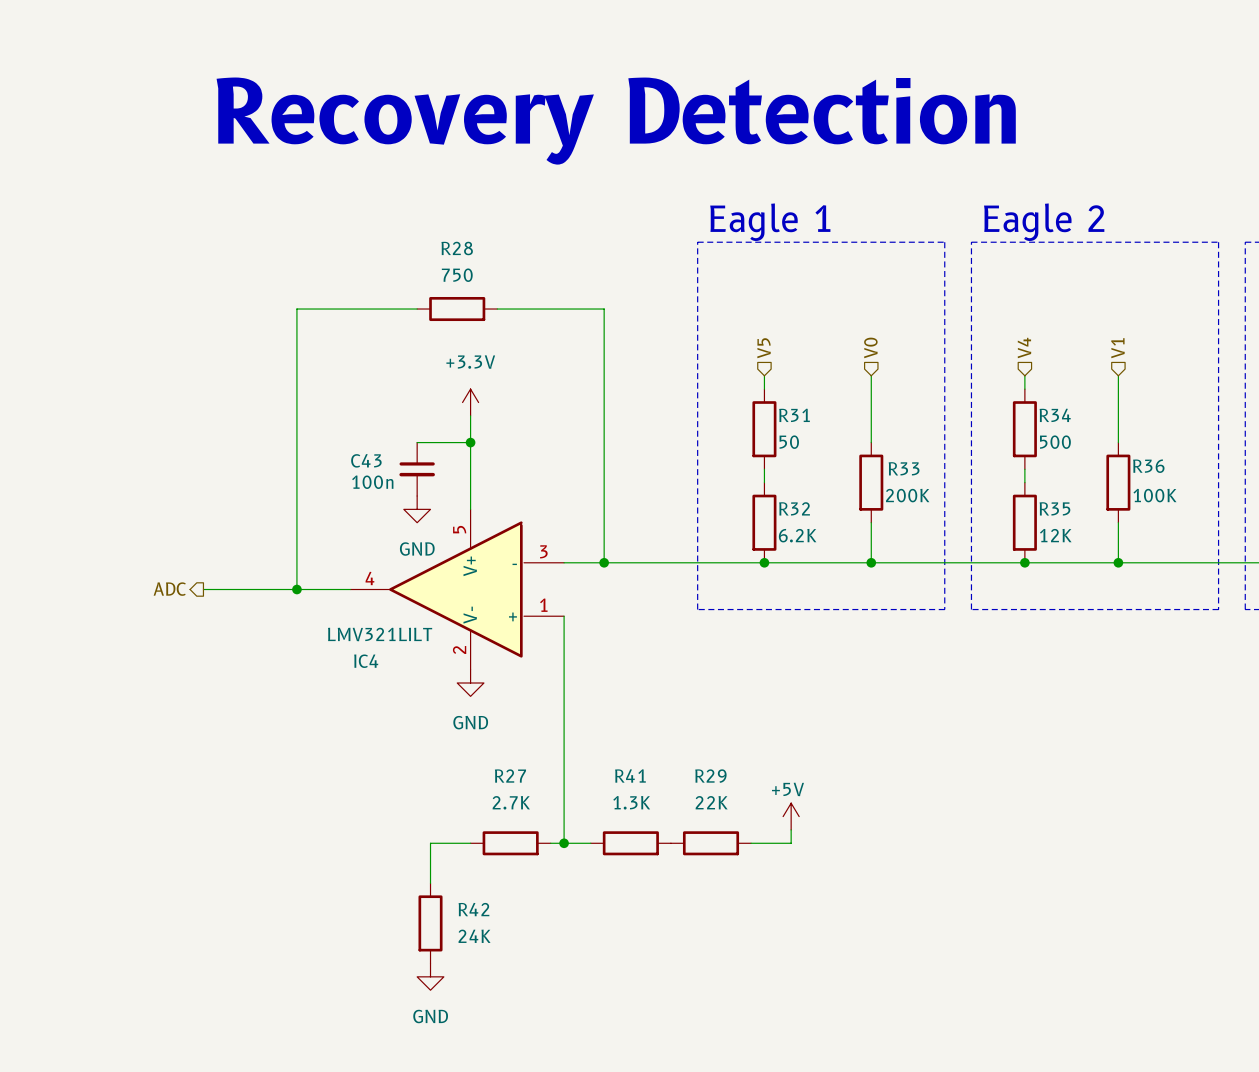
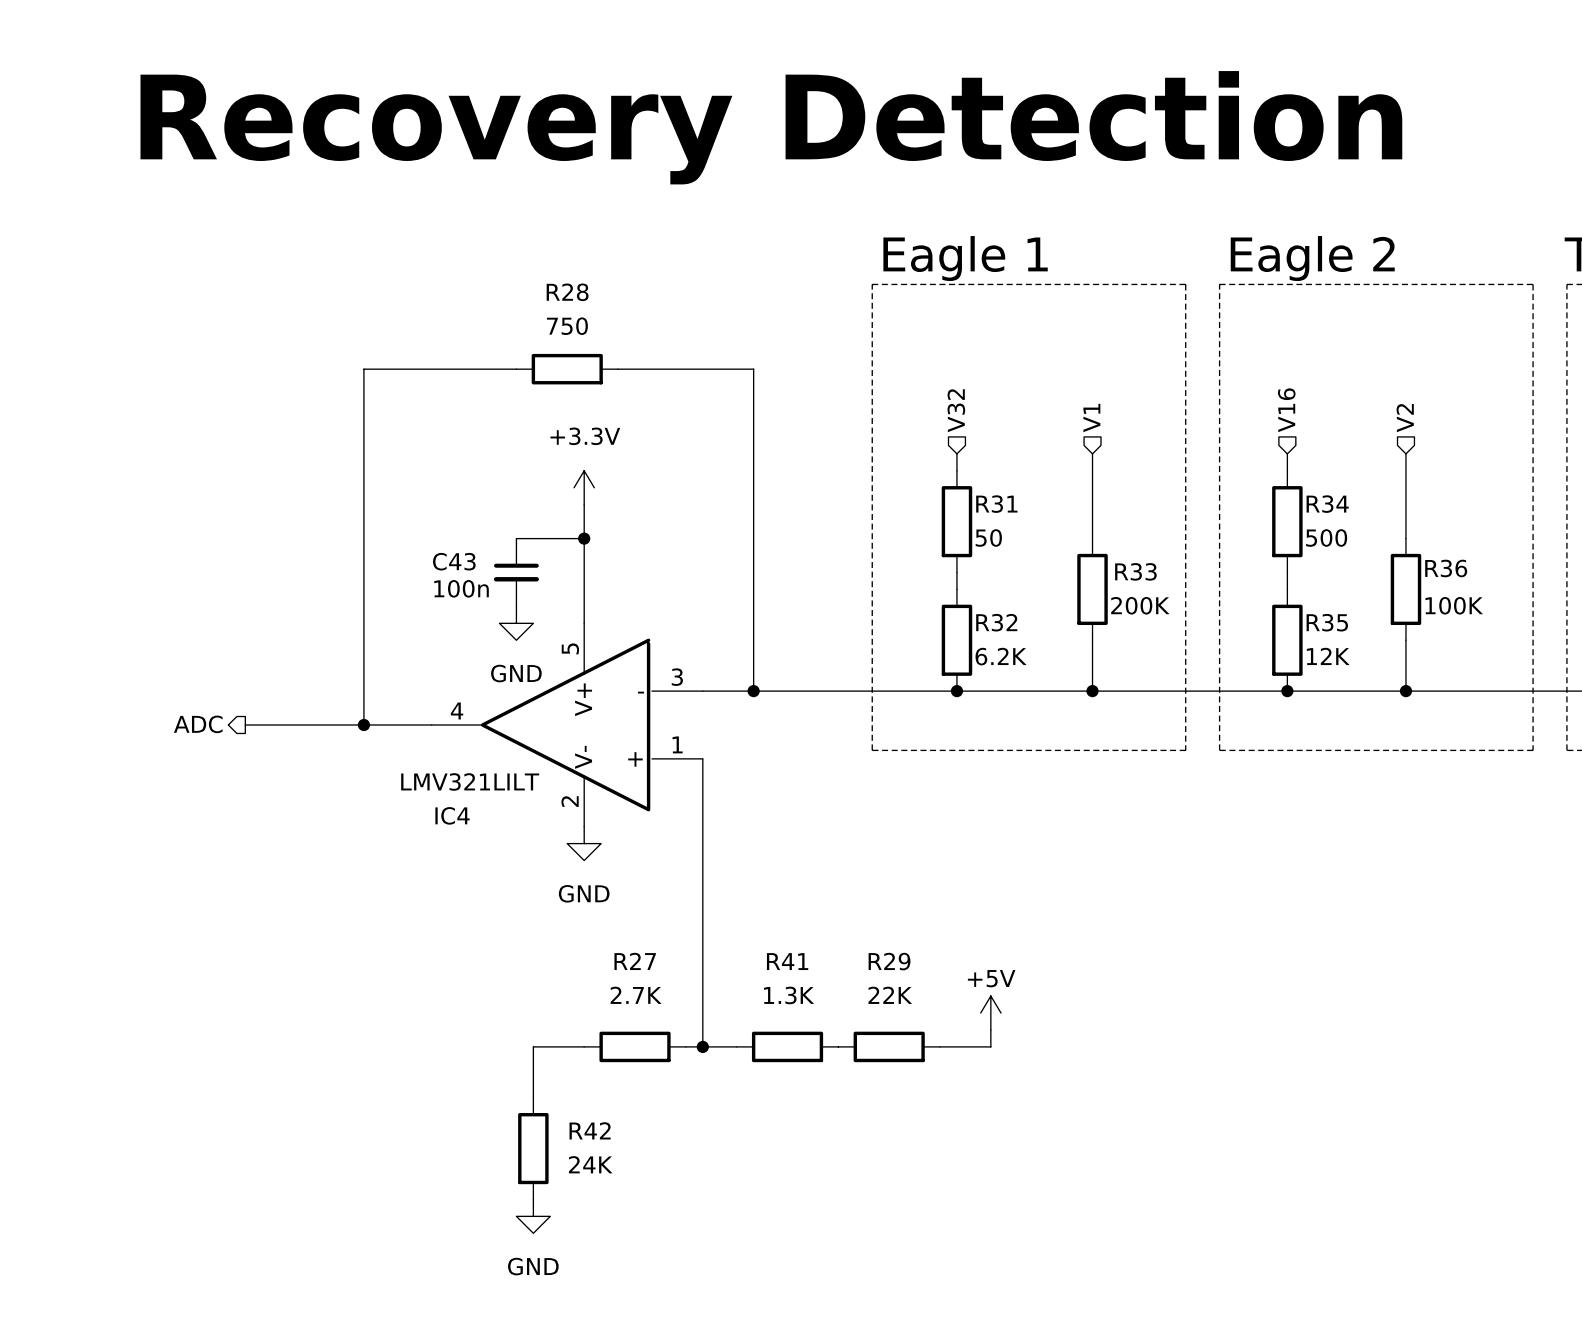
hierarchical label: V0 (870, 347) -> V1 (1091, 418)
hierarchical label: V4 (1024, 347) -> V16 (1286, 410)
hierarchical label: V5 (764, 348) -> V32 (956, 410)
hierarchical label: V1 (1117, 348) -> V2 (1405, 418)

